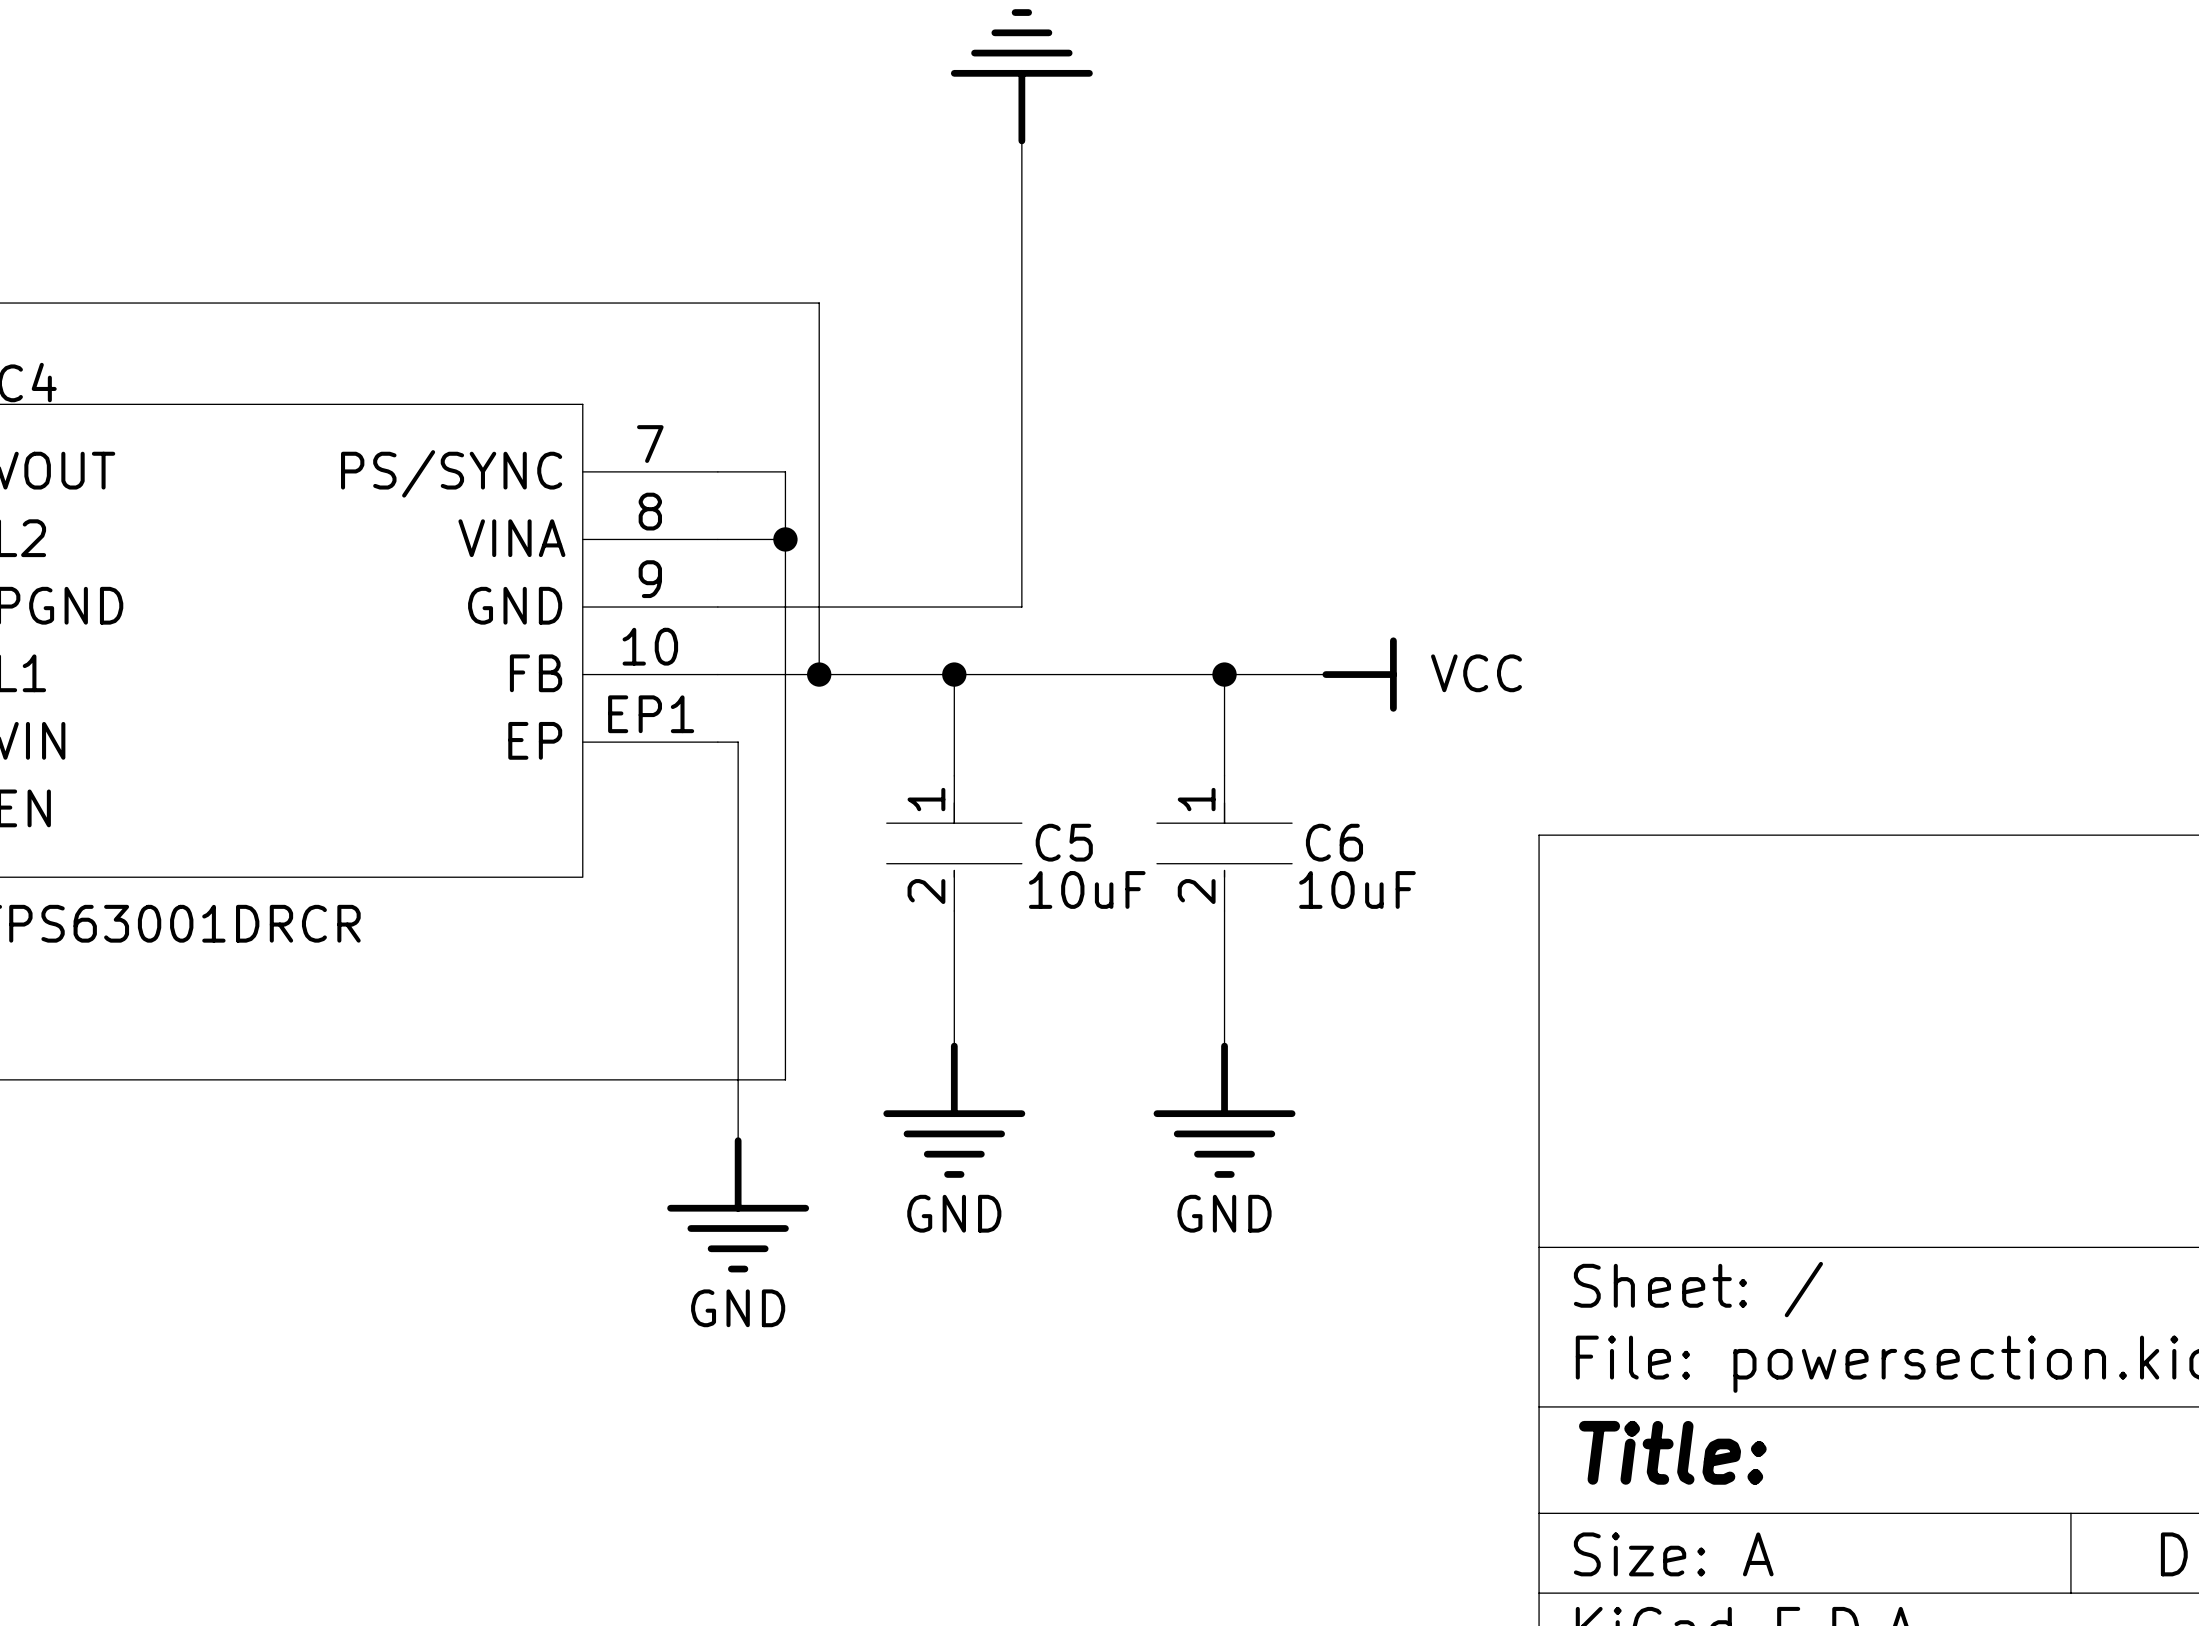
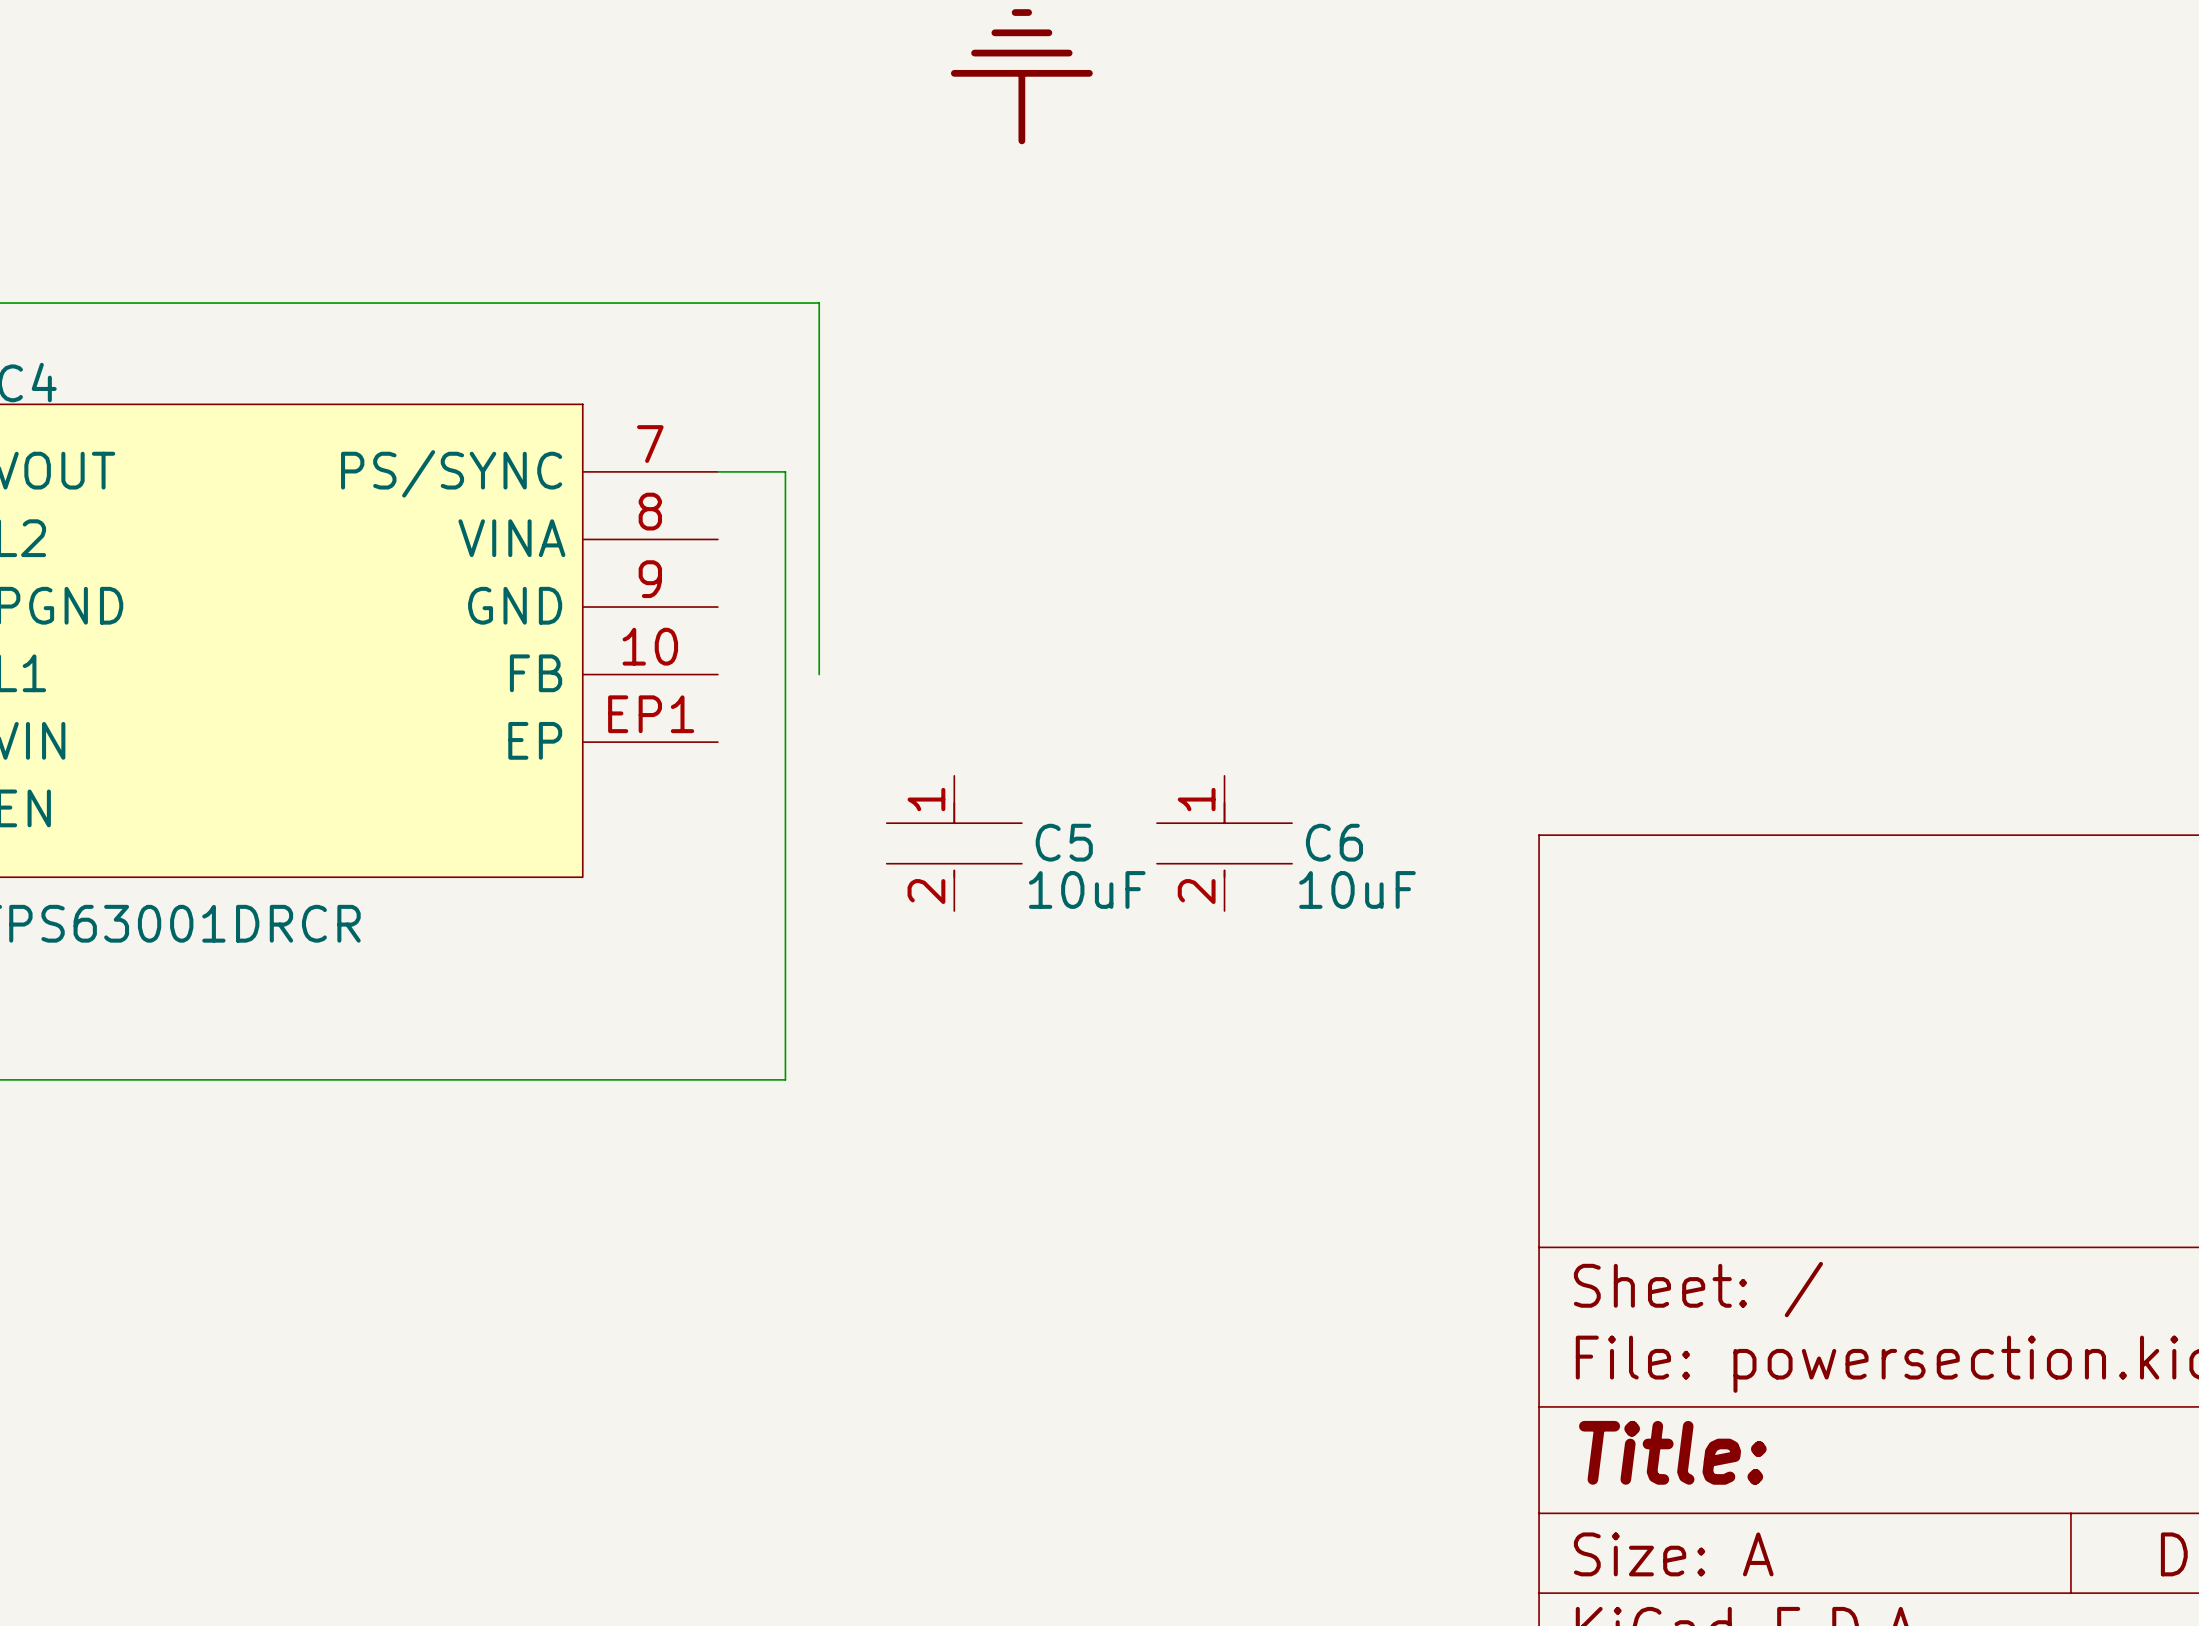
wire: (1021, 140) (1021, 607) (717, 607) -> none
wire: (717, 539) (785, 539) -> none
junction: (785, 539) -> none
wire: (717, 674) (1325, 674) -> none
junction: (819, 674) -> none
wire: (954, 674) (954, 775) -> none
junction: (954, 674) -> none
wire: (1224, 674) (1224, 775) -> none
junction: (1224, 674) -> none
power symbol: VCC (1359, 674) -> none
wire: (717, 742) (738, 742) (738, 1140) -> none
wire: (954, 910) (954, 1046) -> none
wire: (1224, 910) (1224, 1046) -> none
power symbol: GND (954, 1110) -> none
power symbol: GND (1224, 1110) -> none
power symbol: GND (738, 1204) -> none

